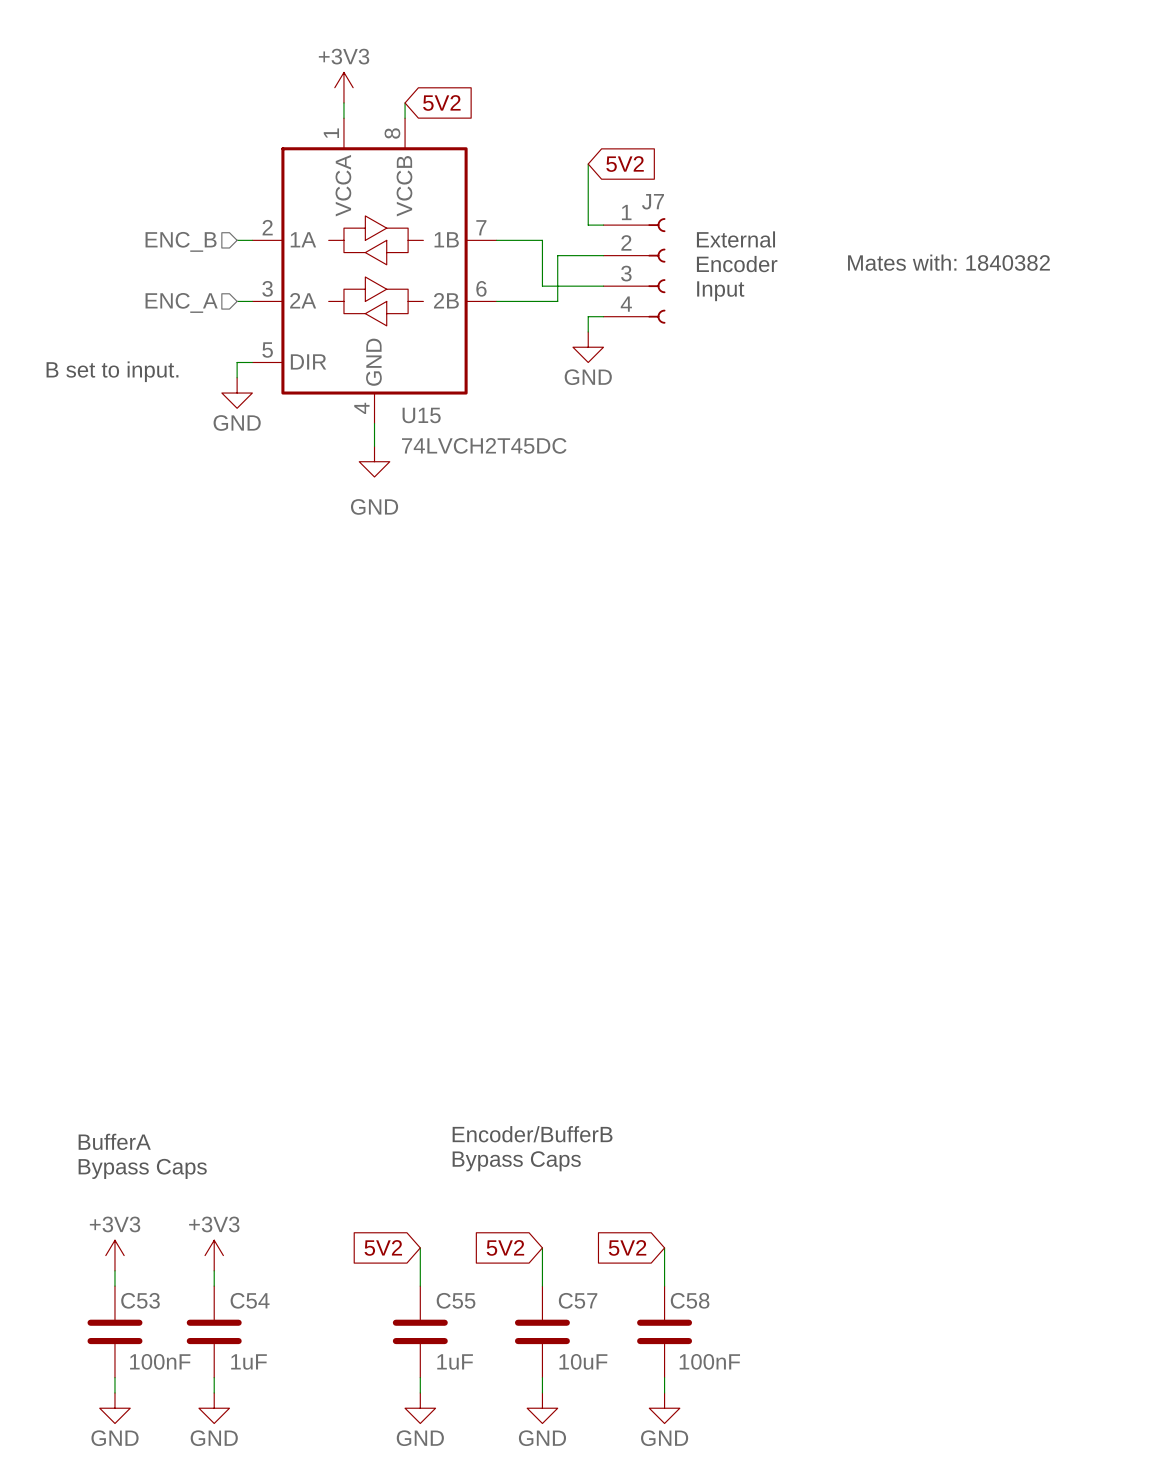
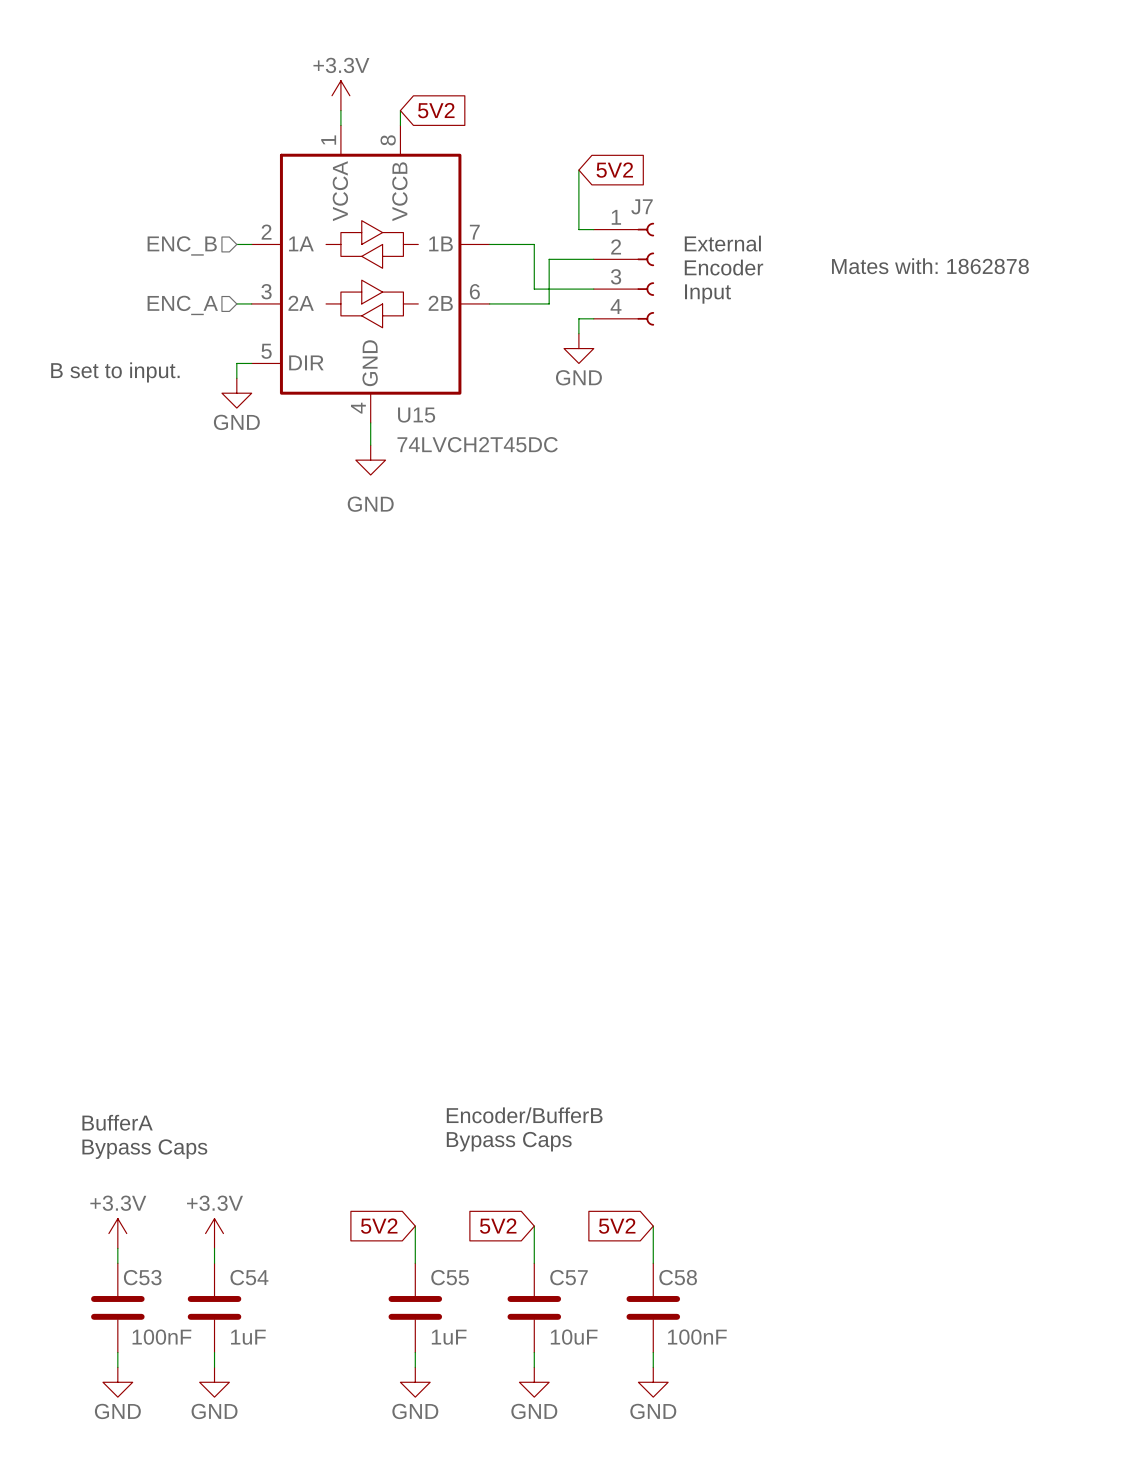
power symbol: +3V3 (343, 87) -> +3.3V (340, 95)
text: Mates with: 1840382 (948, 262) -> Mates with: 1862878 (930, 266)
power symbol: +3V3 (114, 1255) -> +3.3V (117, 1233)
power symbol: +3V3 (214, 1255) -> +3.3V (214, 1233)

